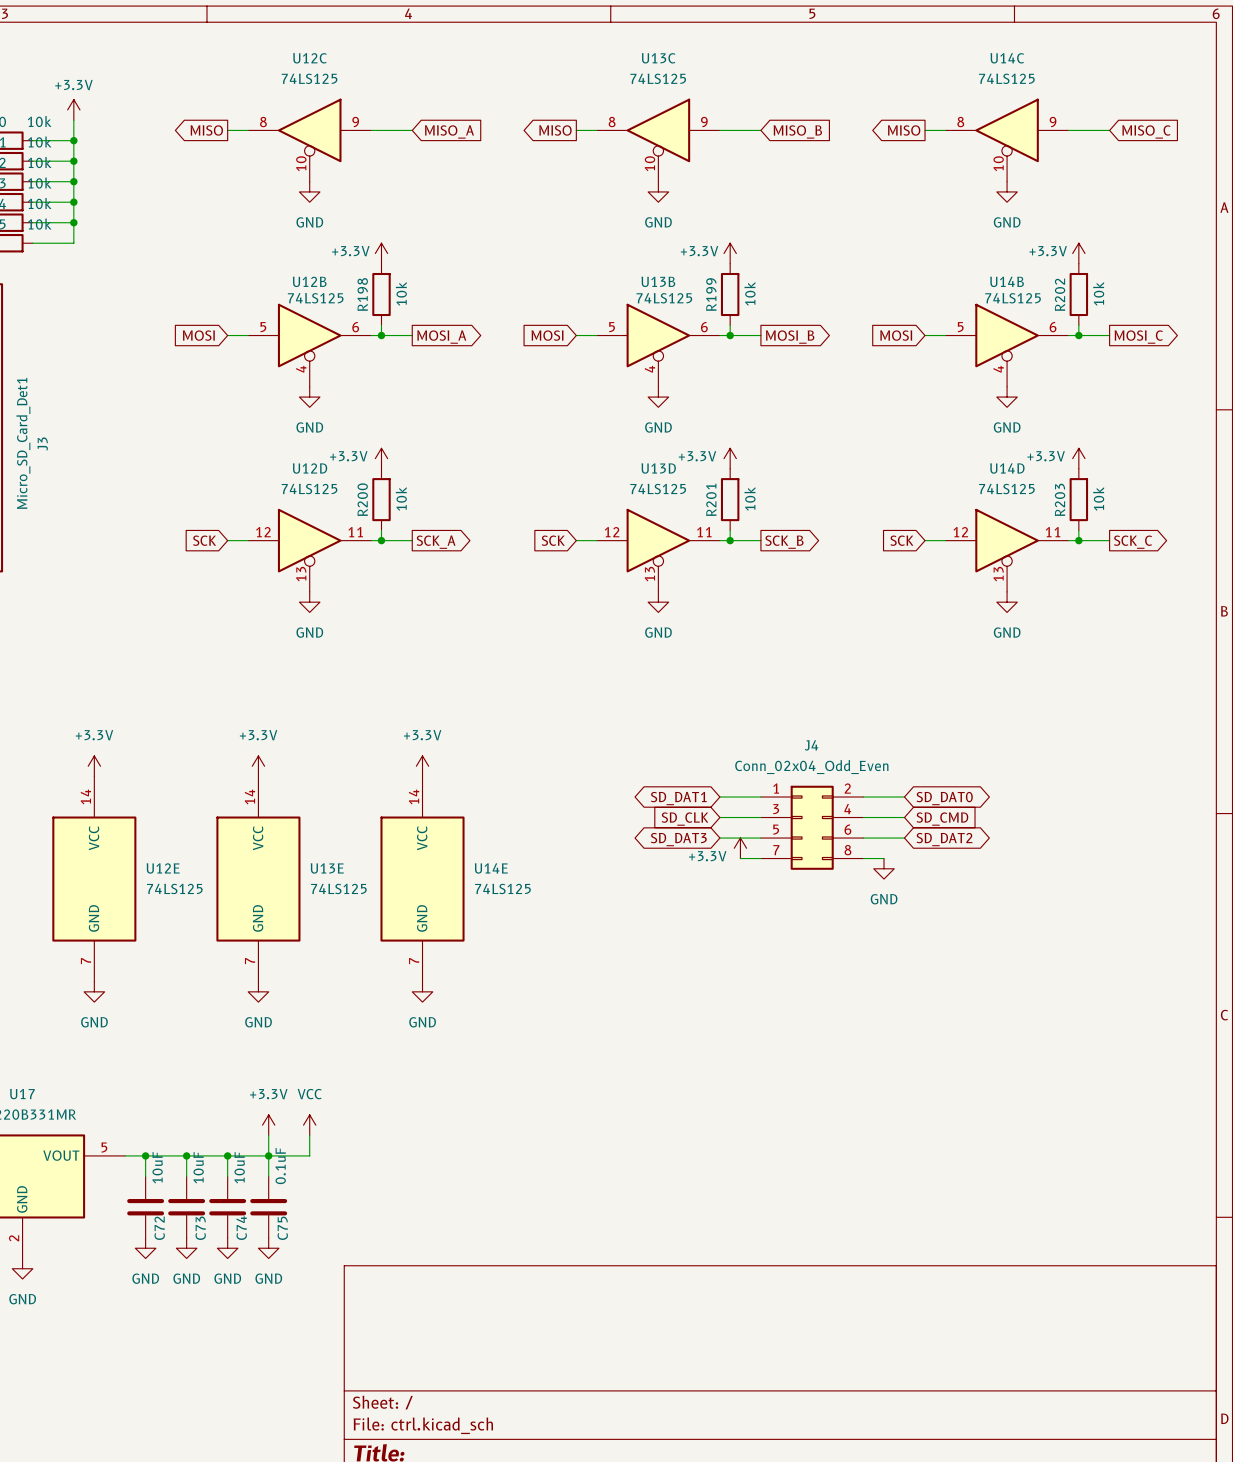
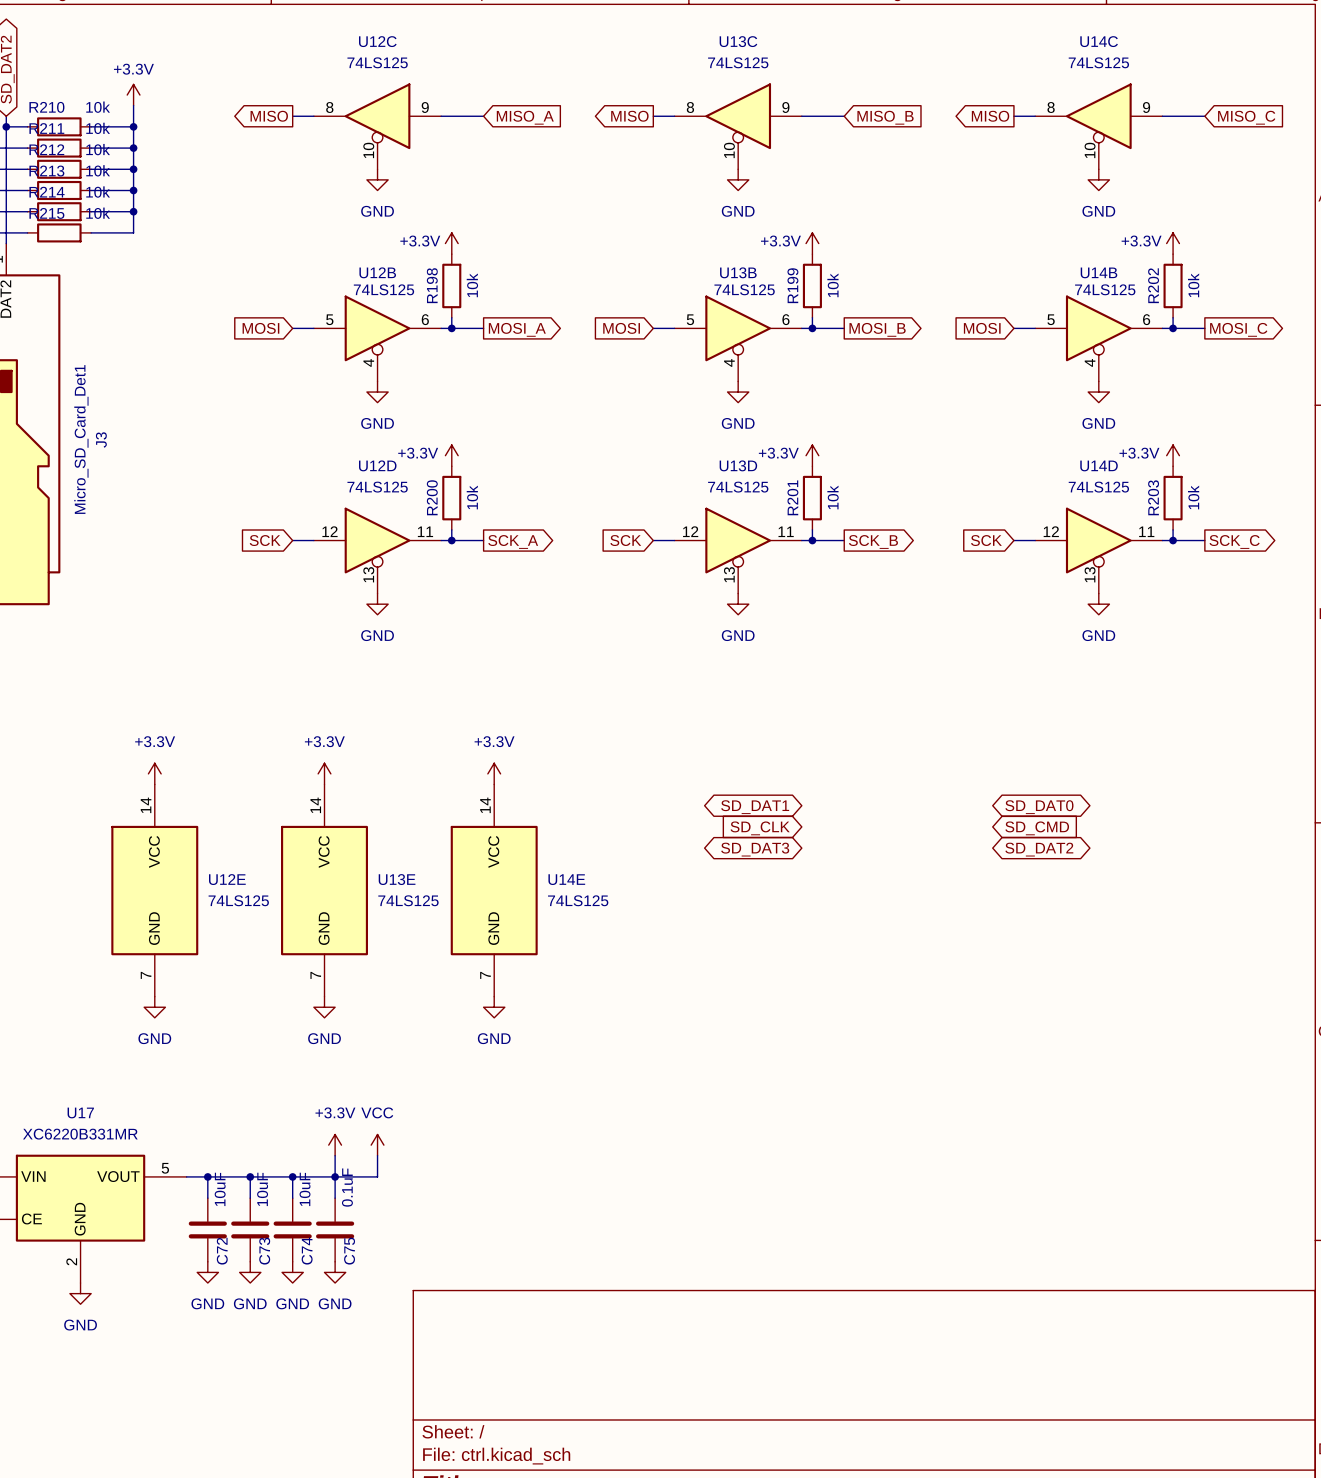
wire: (719, 797) (760, 797) -> none
wire: (863, 797) (904, 797) -> none
wire: (719, 817) (760, 817) -> none
wire: (863, 817) (904, 817) -> none
J4: Conn_02x04_Odd_Even (812, 827) -> none
wire: (719, 838) (760, 838) -> none
wire: (863, 838) (904, 838) -> none
power symbol: +3.3V (740, 848) -> none
wire: (740, 858) (760, 858) -> none
wire: (863, 858) (883, 858) -> none
power symbol: GND (883, 868) -> none

